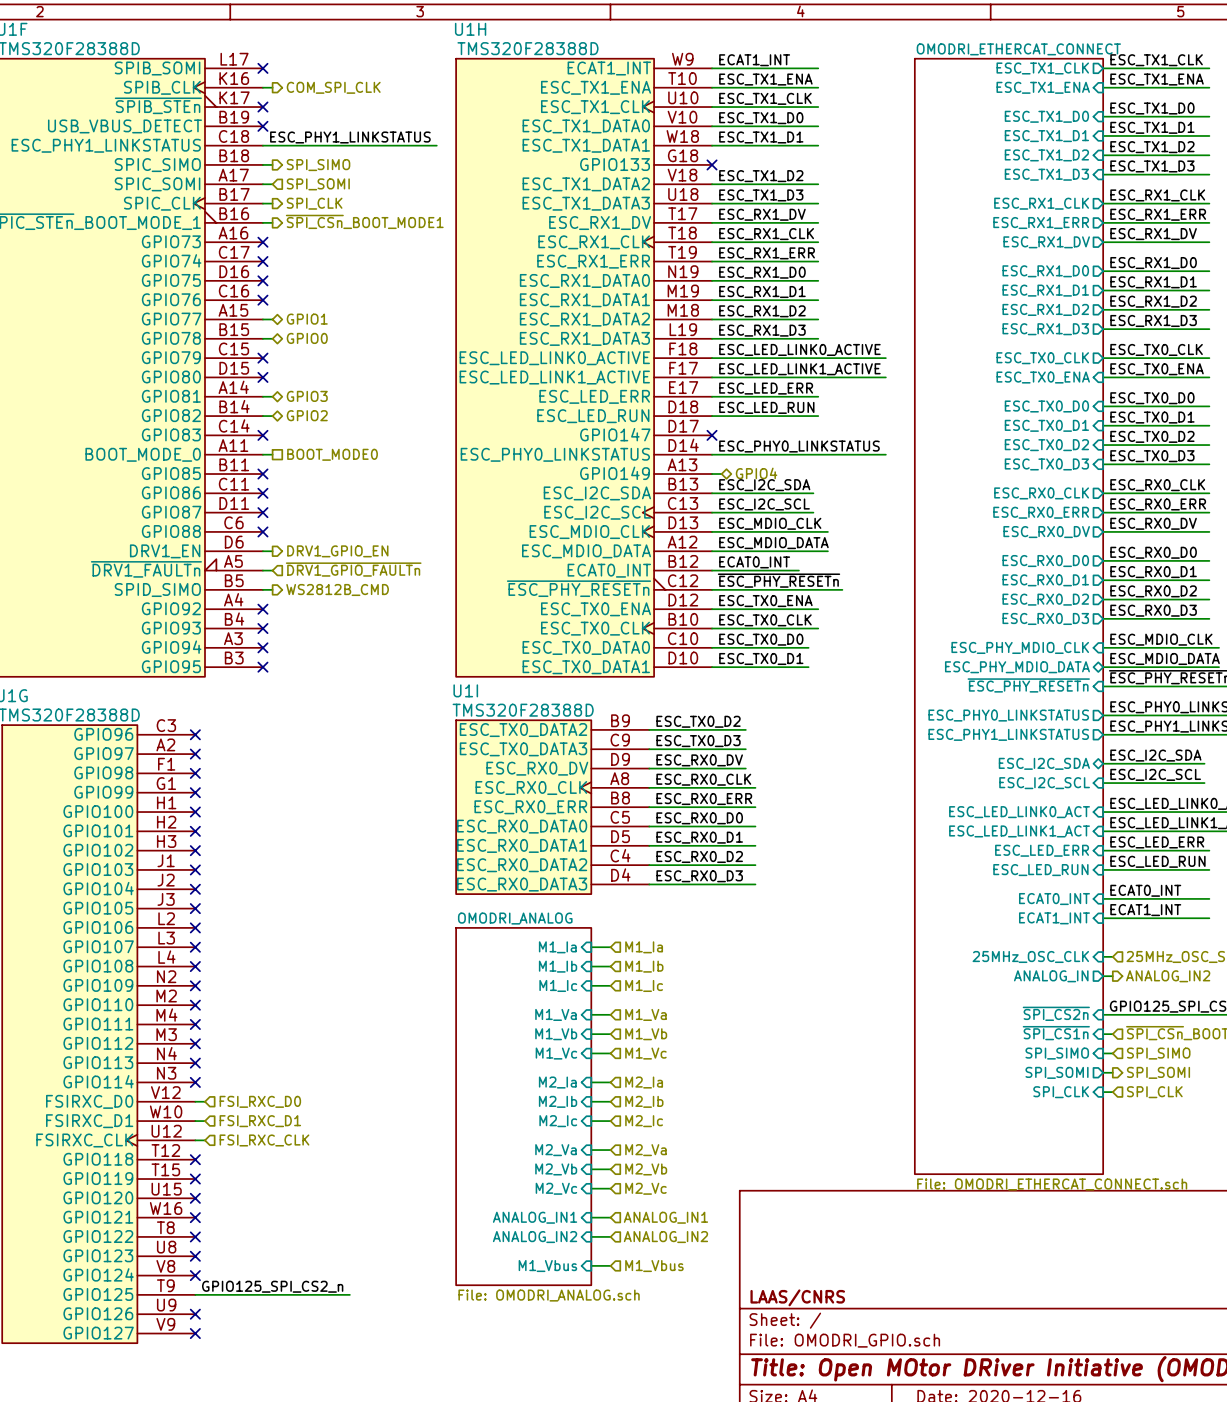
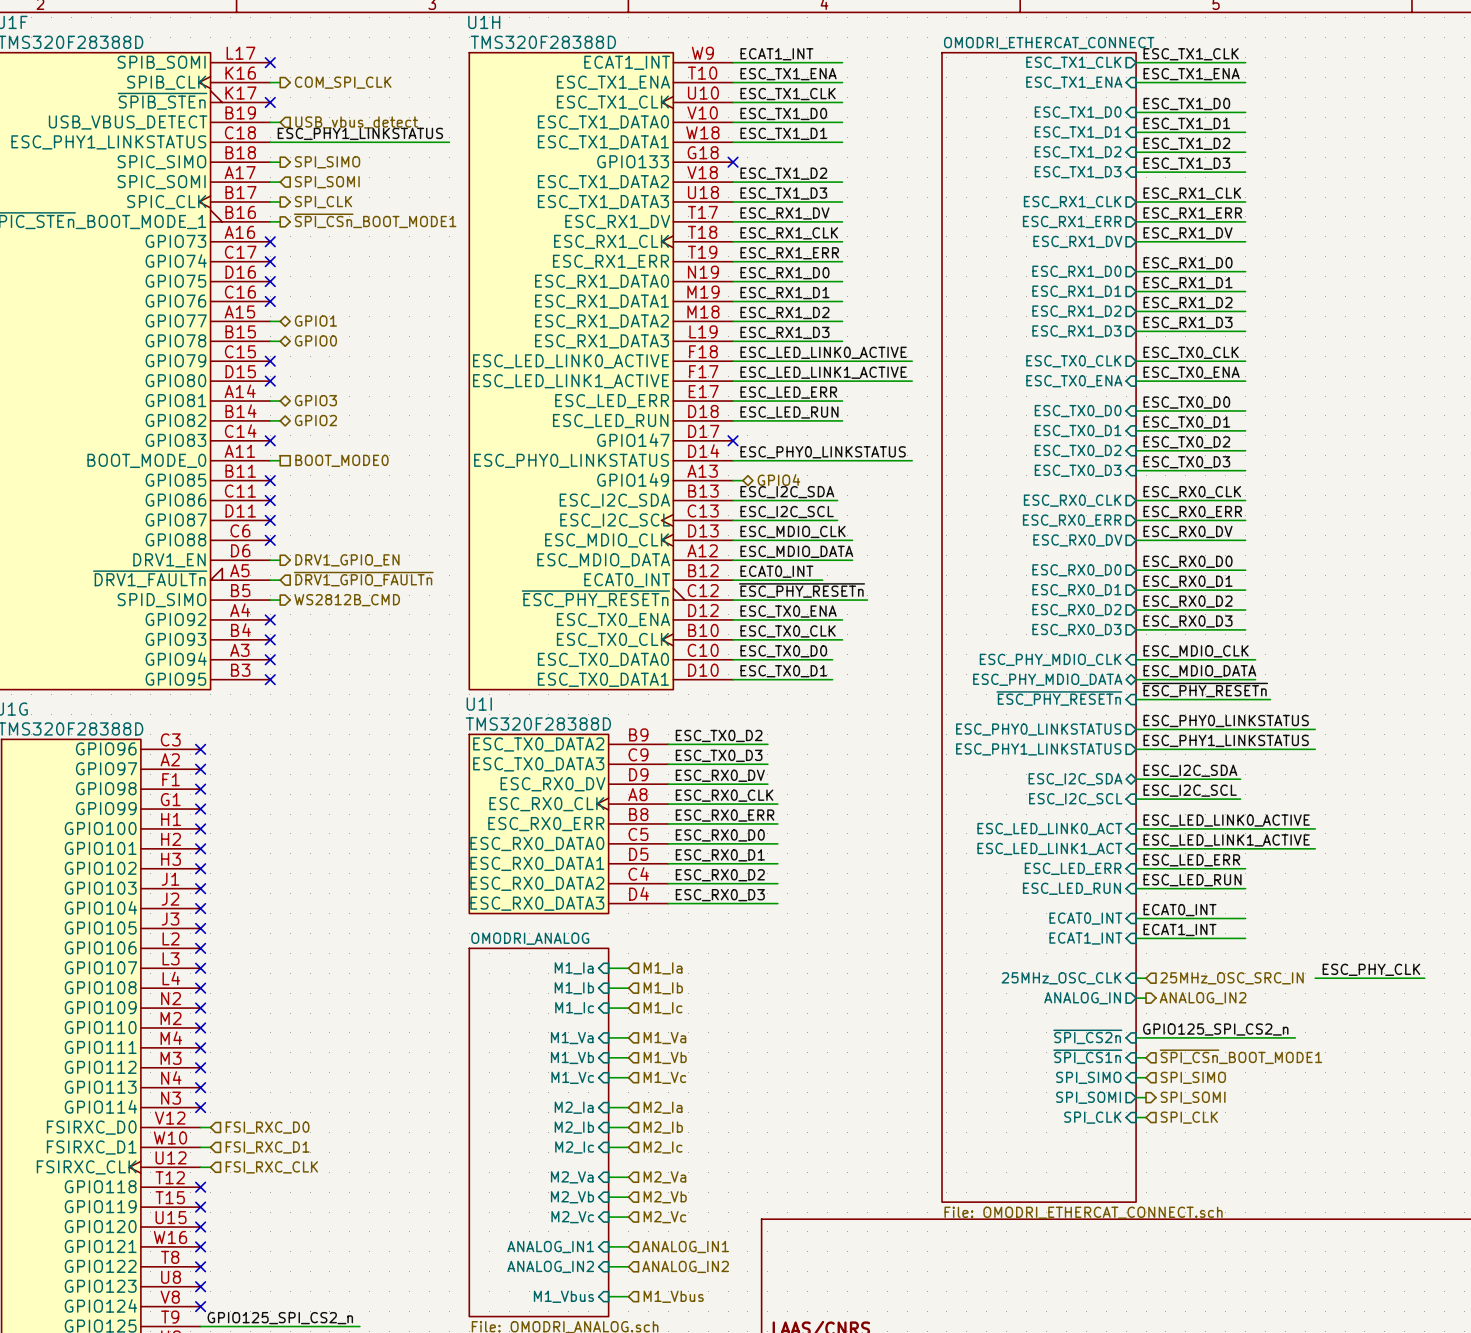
wire: none -> (270, 122) (280, 122)
no-connect mark: (262, 126) -> none
hierarchical label: none -> USB_vbus_detect (356, 122)

